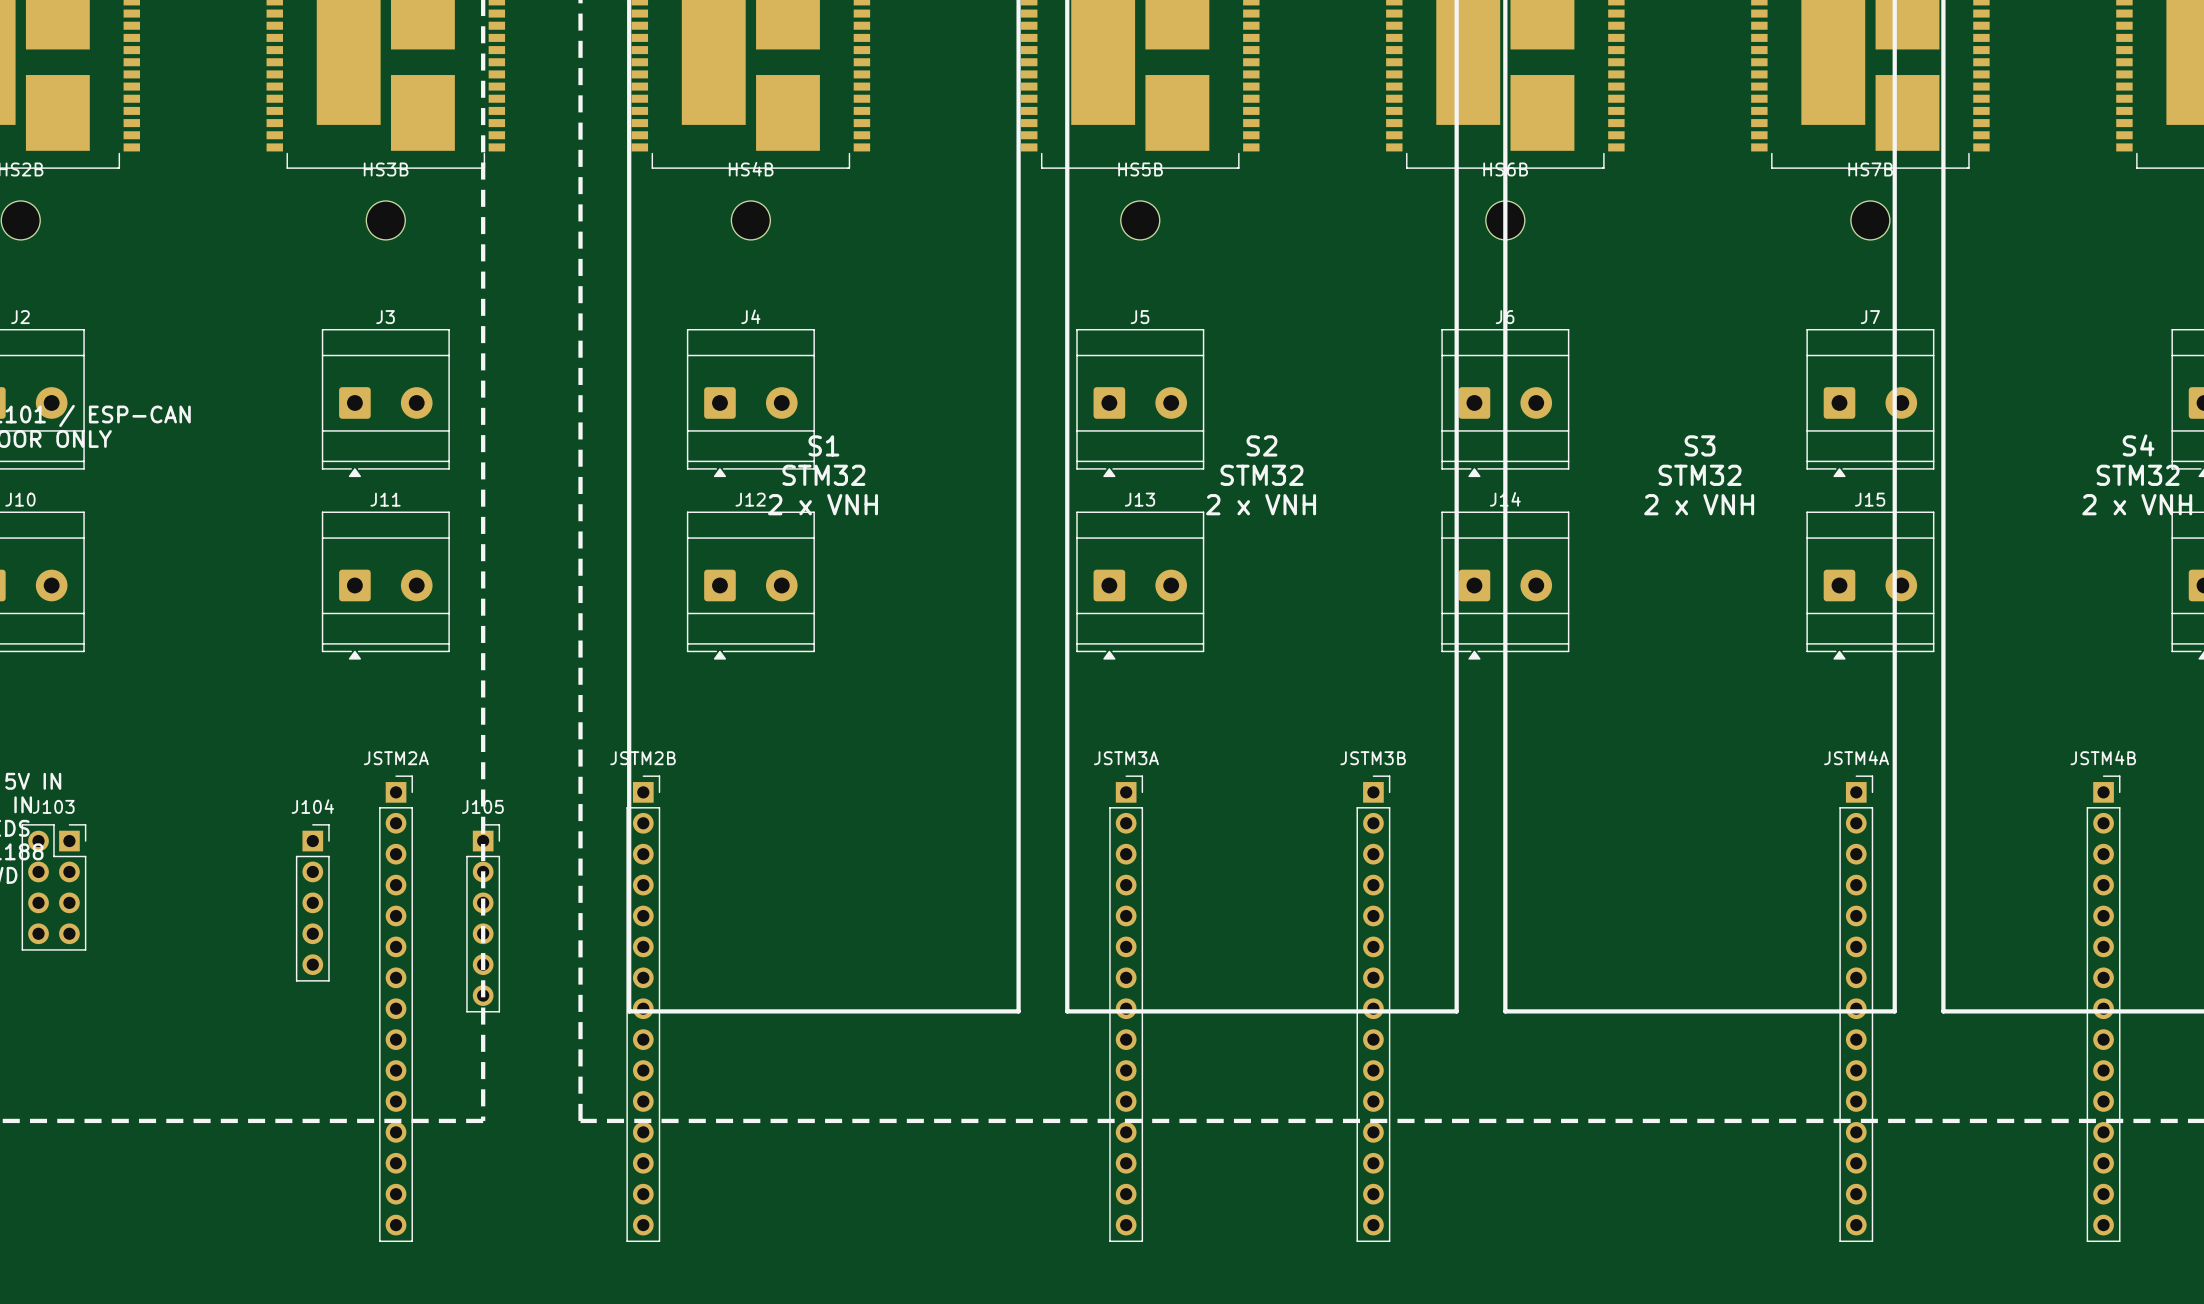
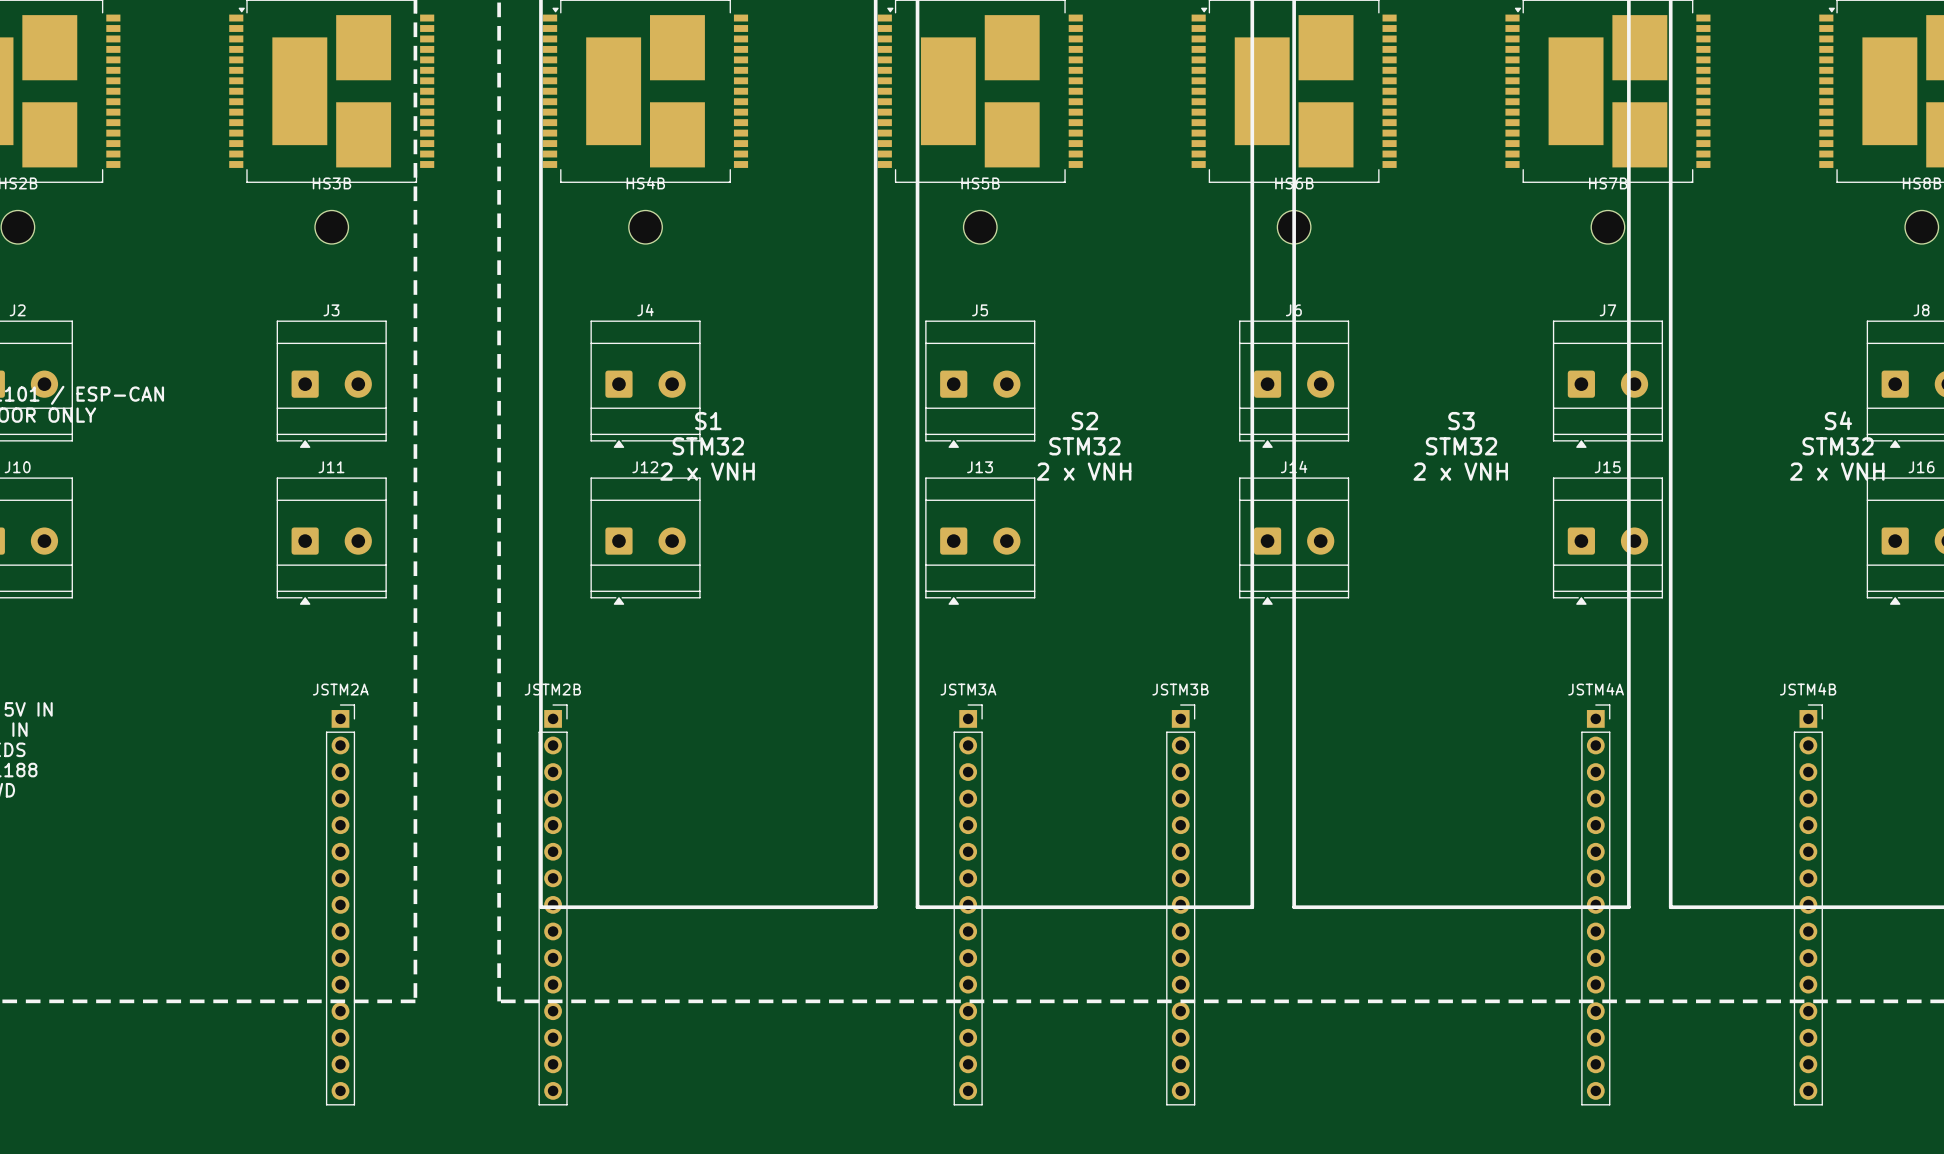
J103: (53, 887) -> none
J104: (312, 902) -> none
J105: (483, 918) -> none

